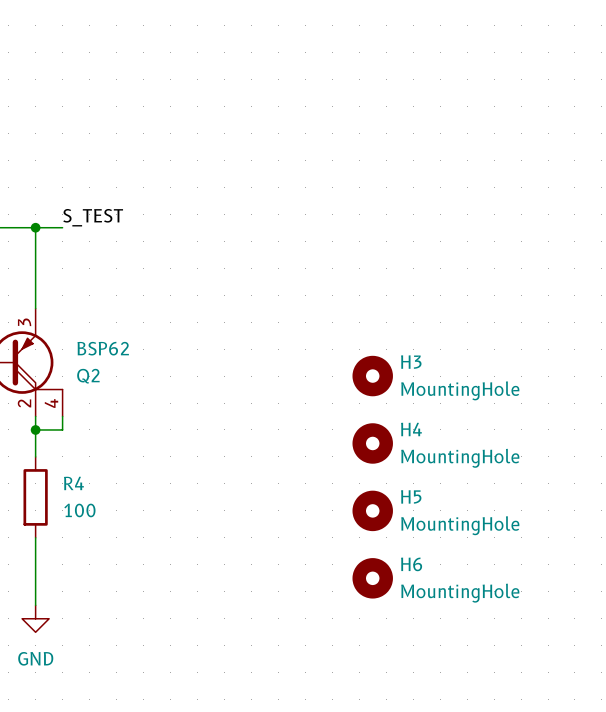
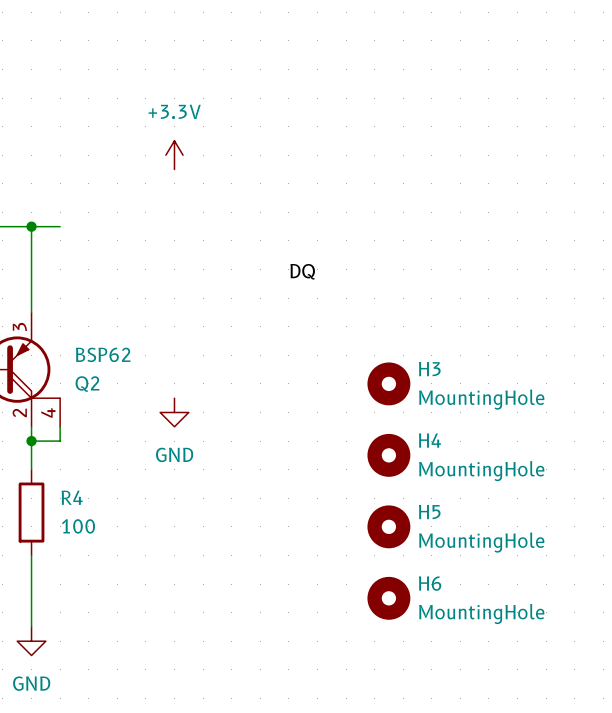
power symbol: none -> +3.3V (174, 155)
label: S_TEST (93, 217) -> none
label: none -> DQ (302, 271)
power symbol: none -> GND (174, 412)

